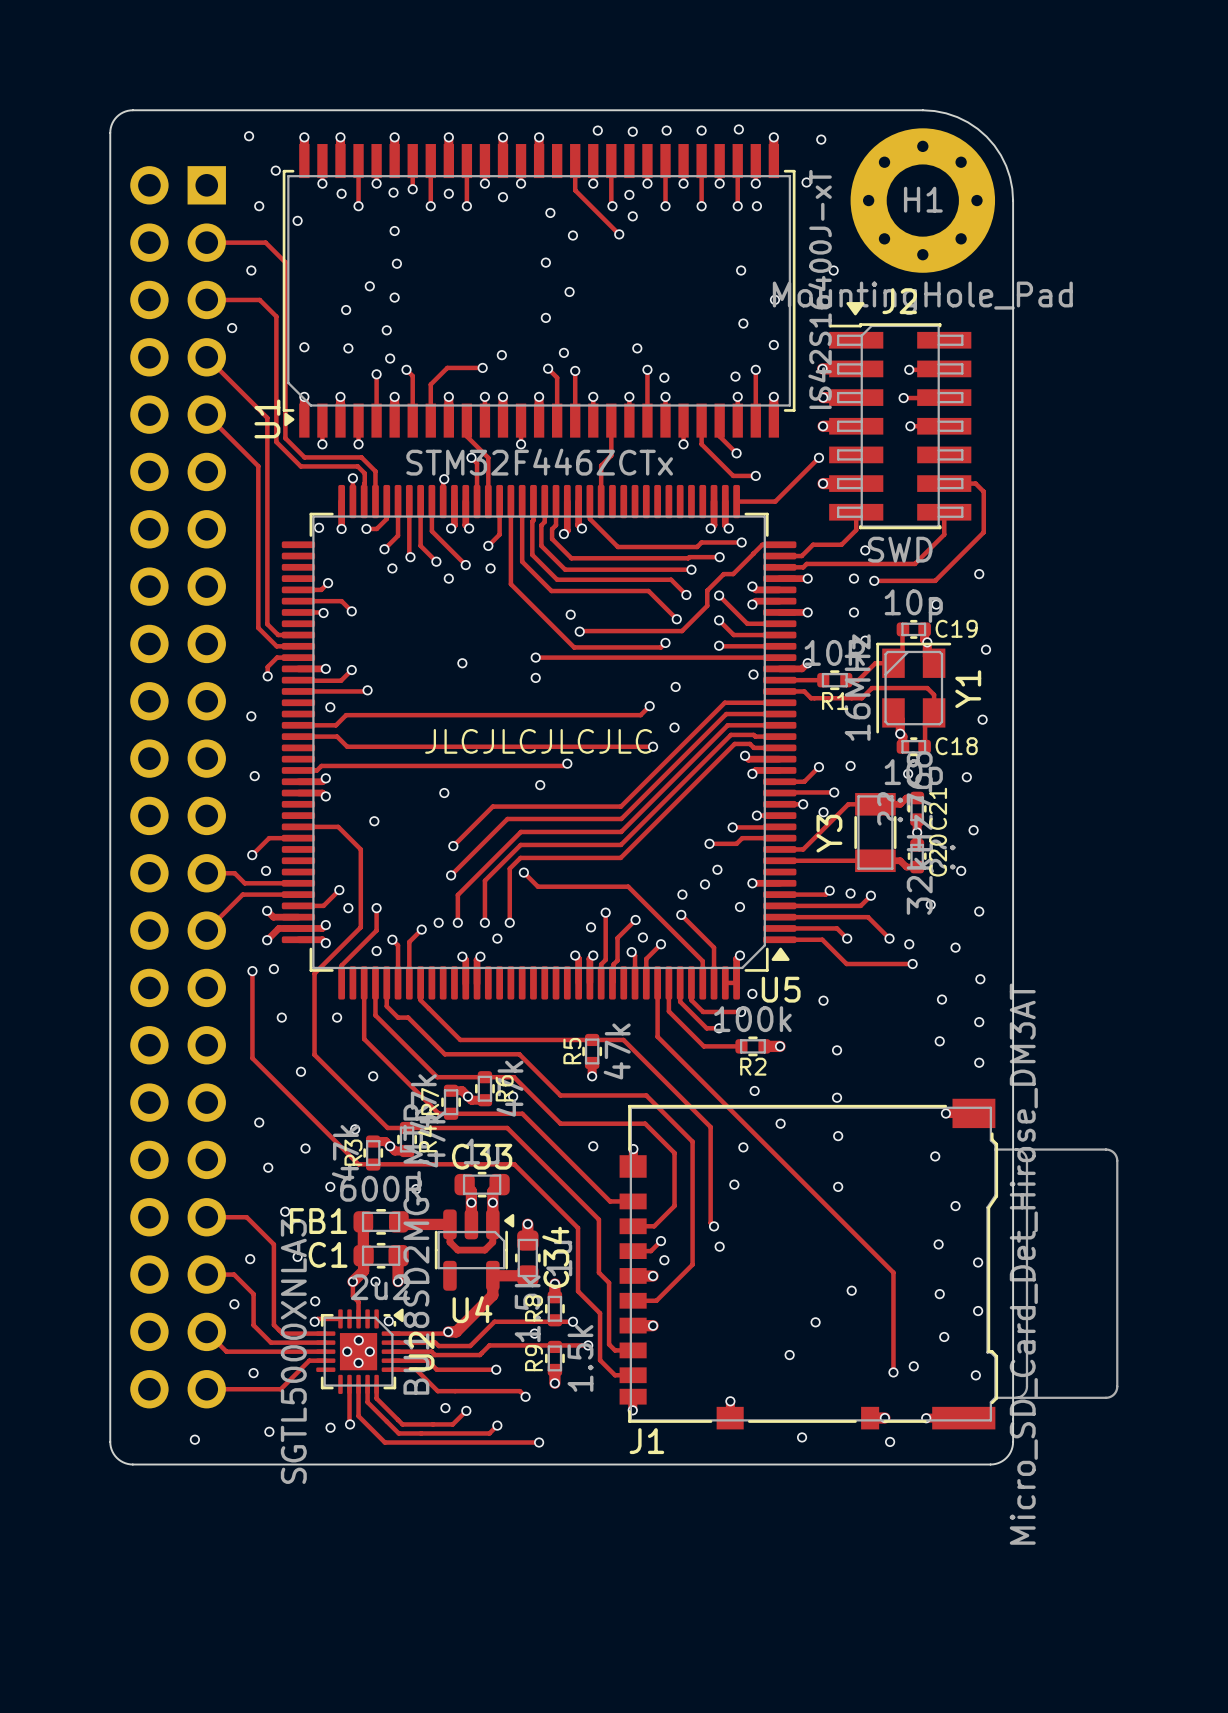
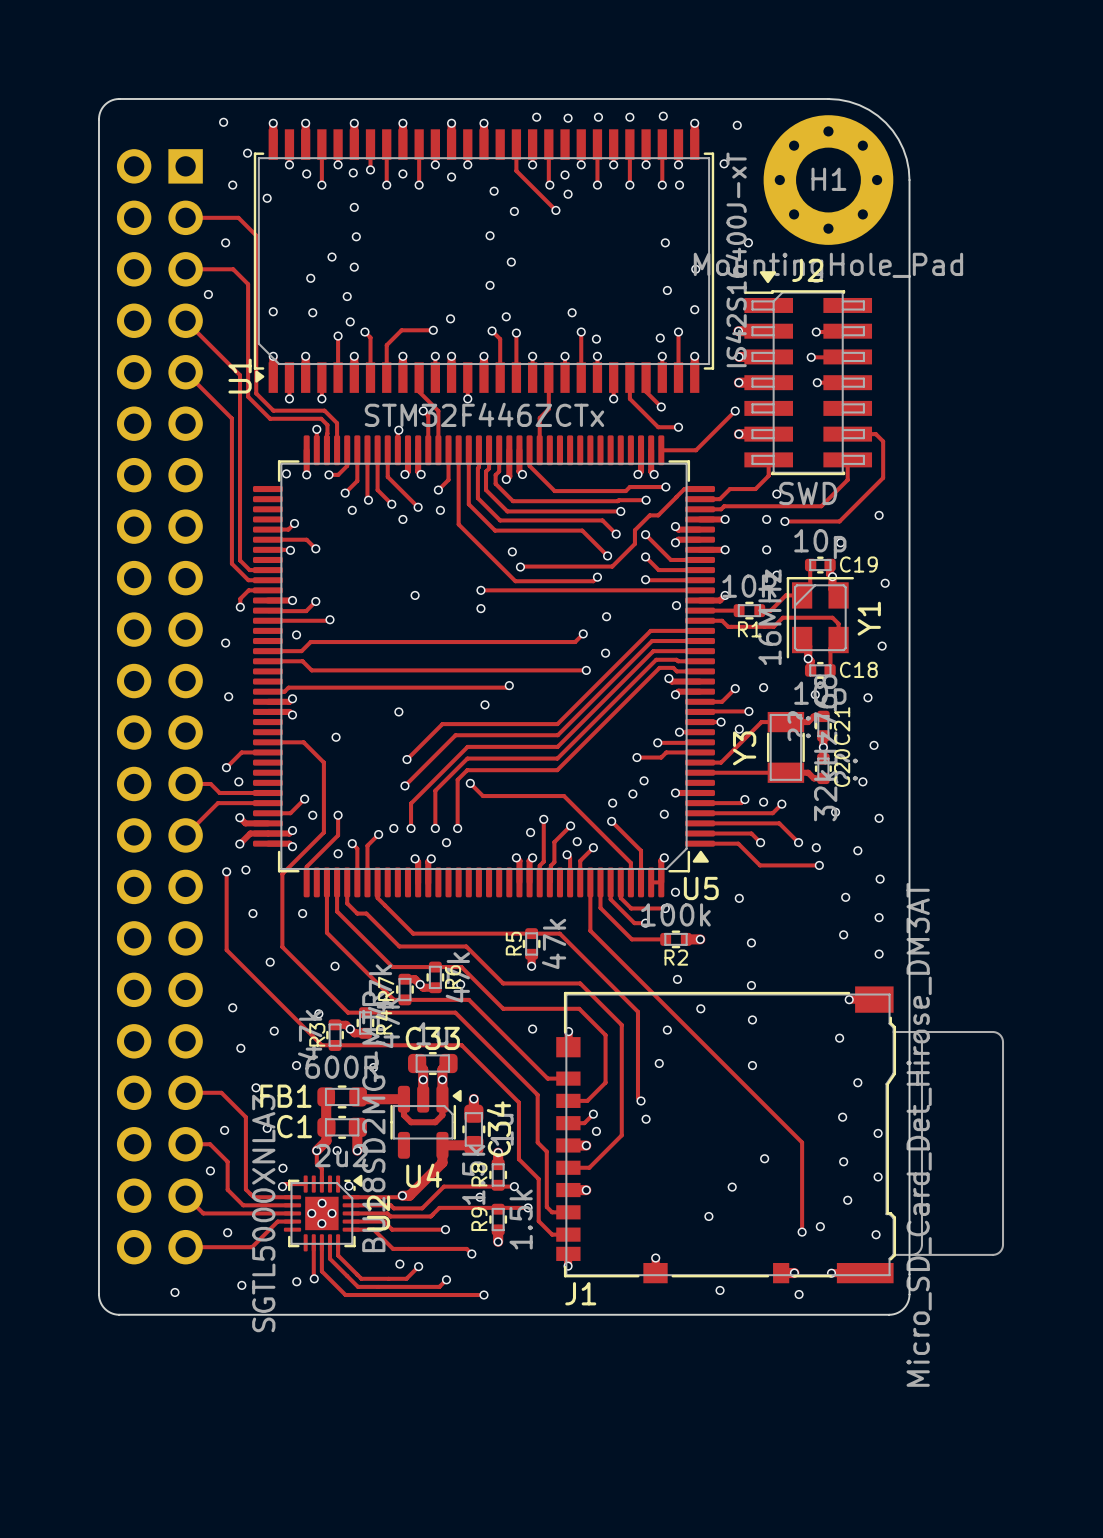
text: JLCJLCJLCJLC (538, 741) -> none

